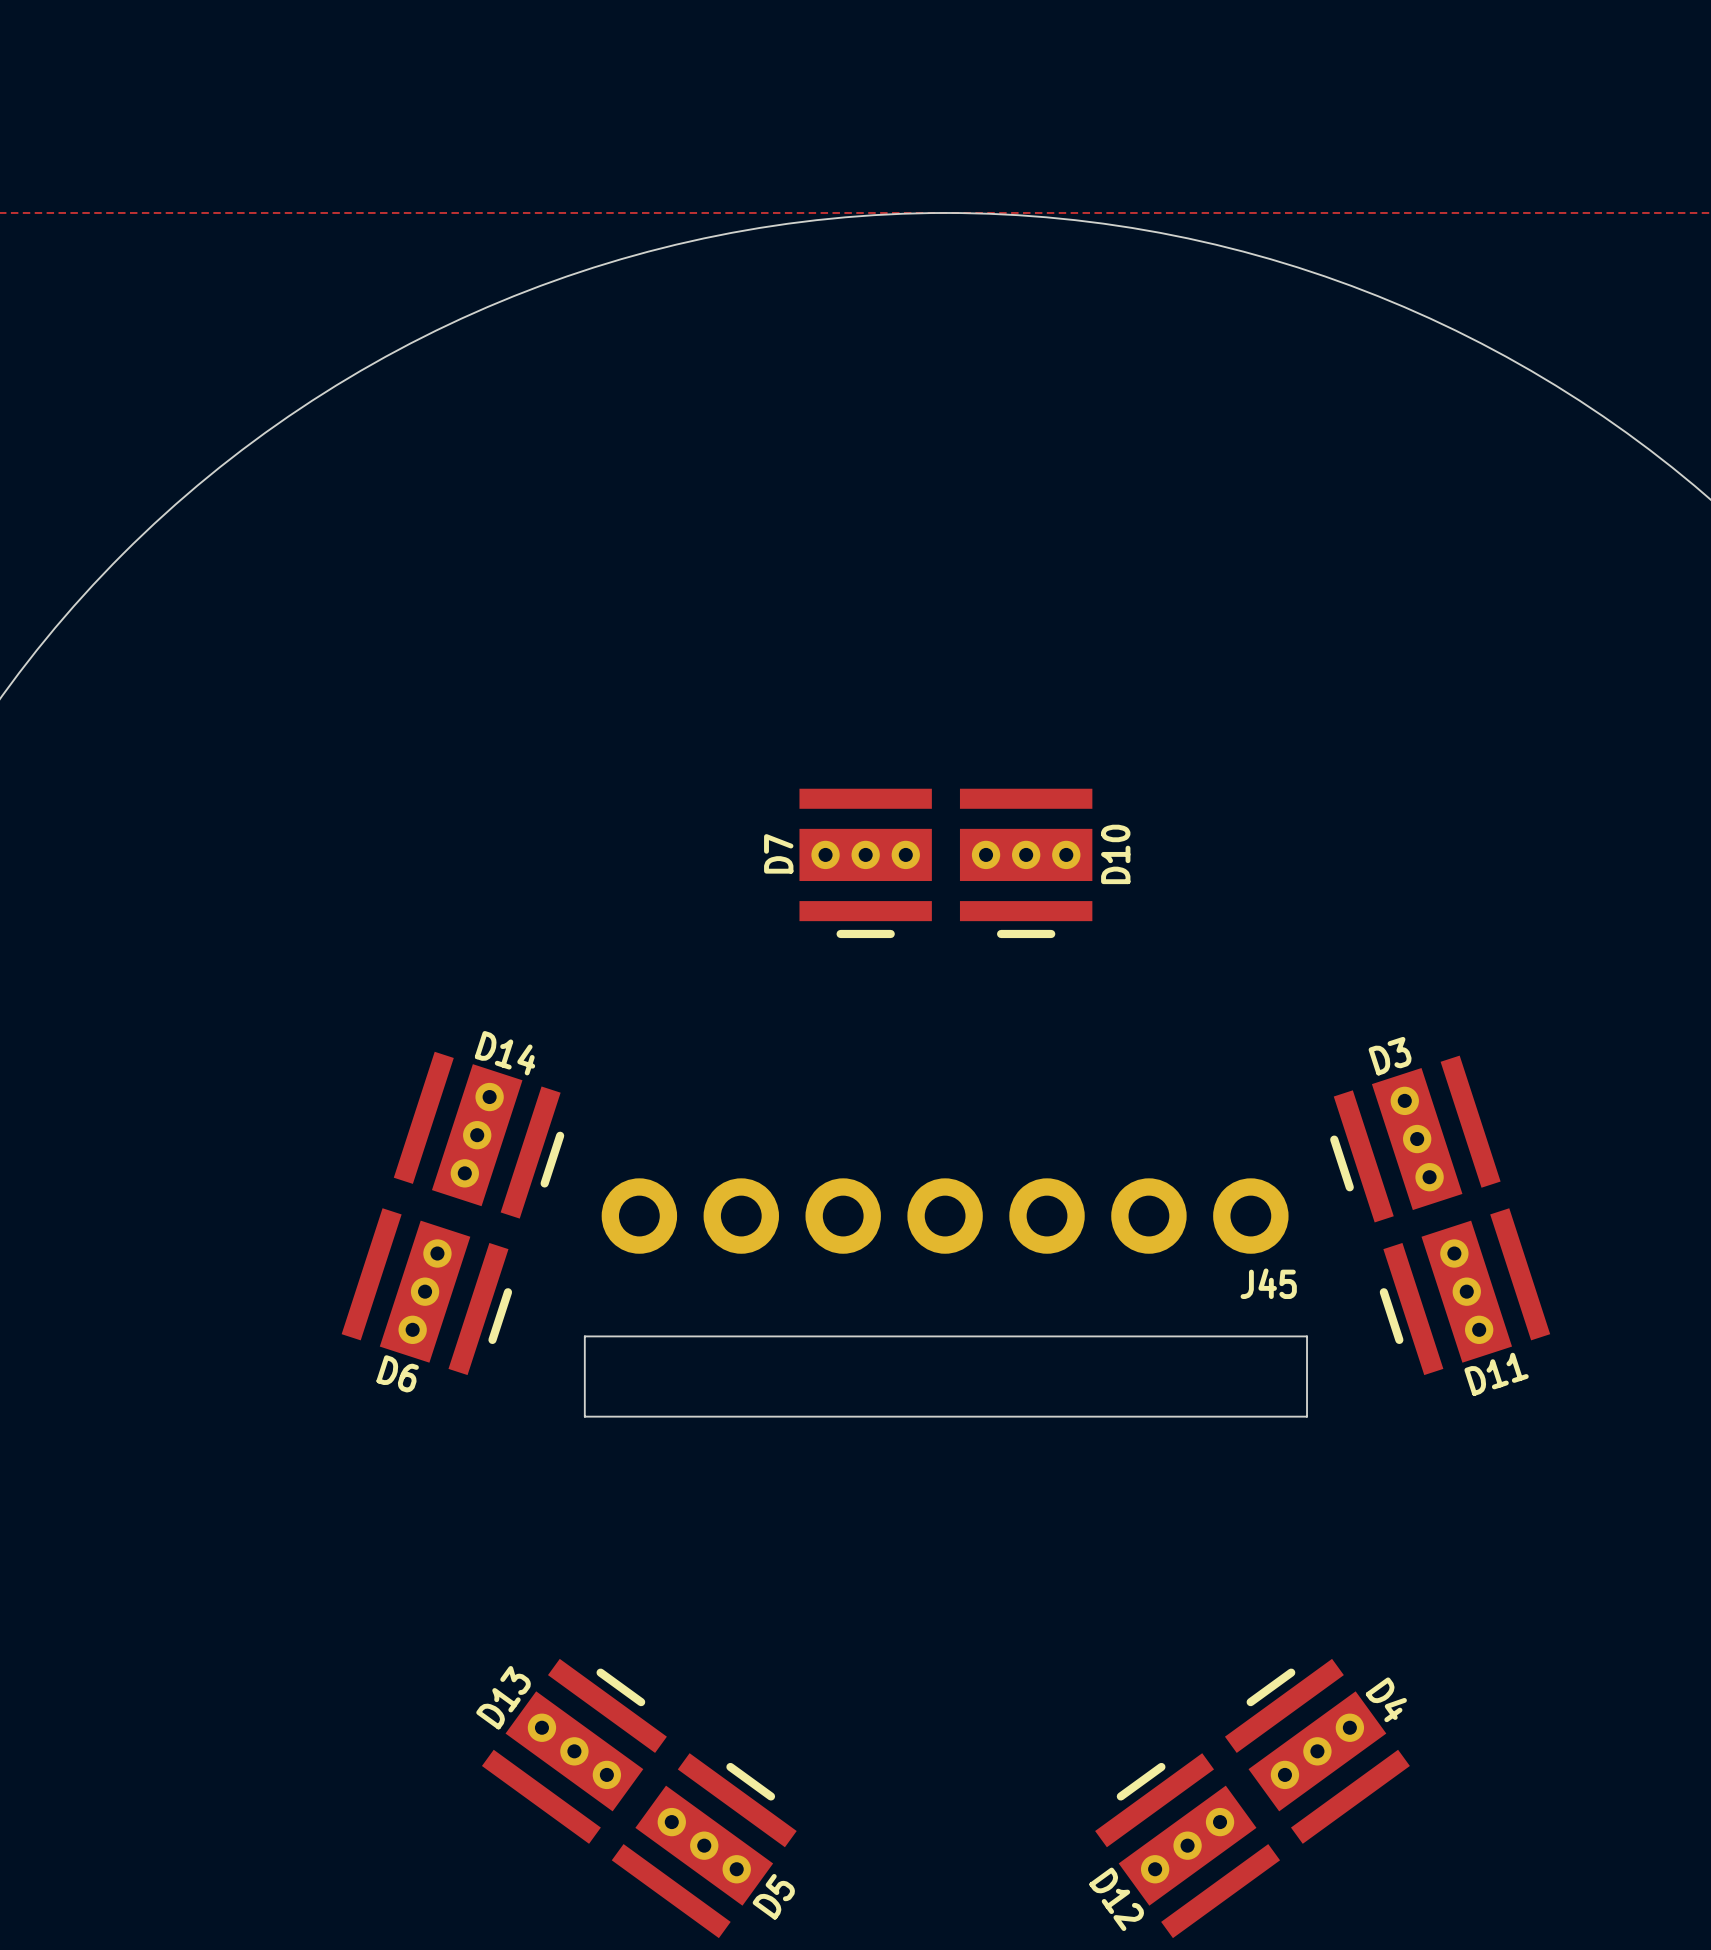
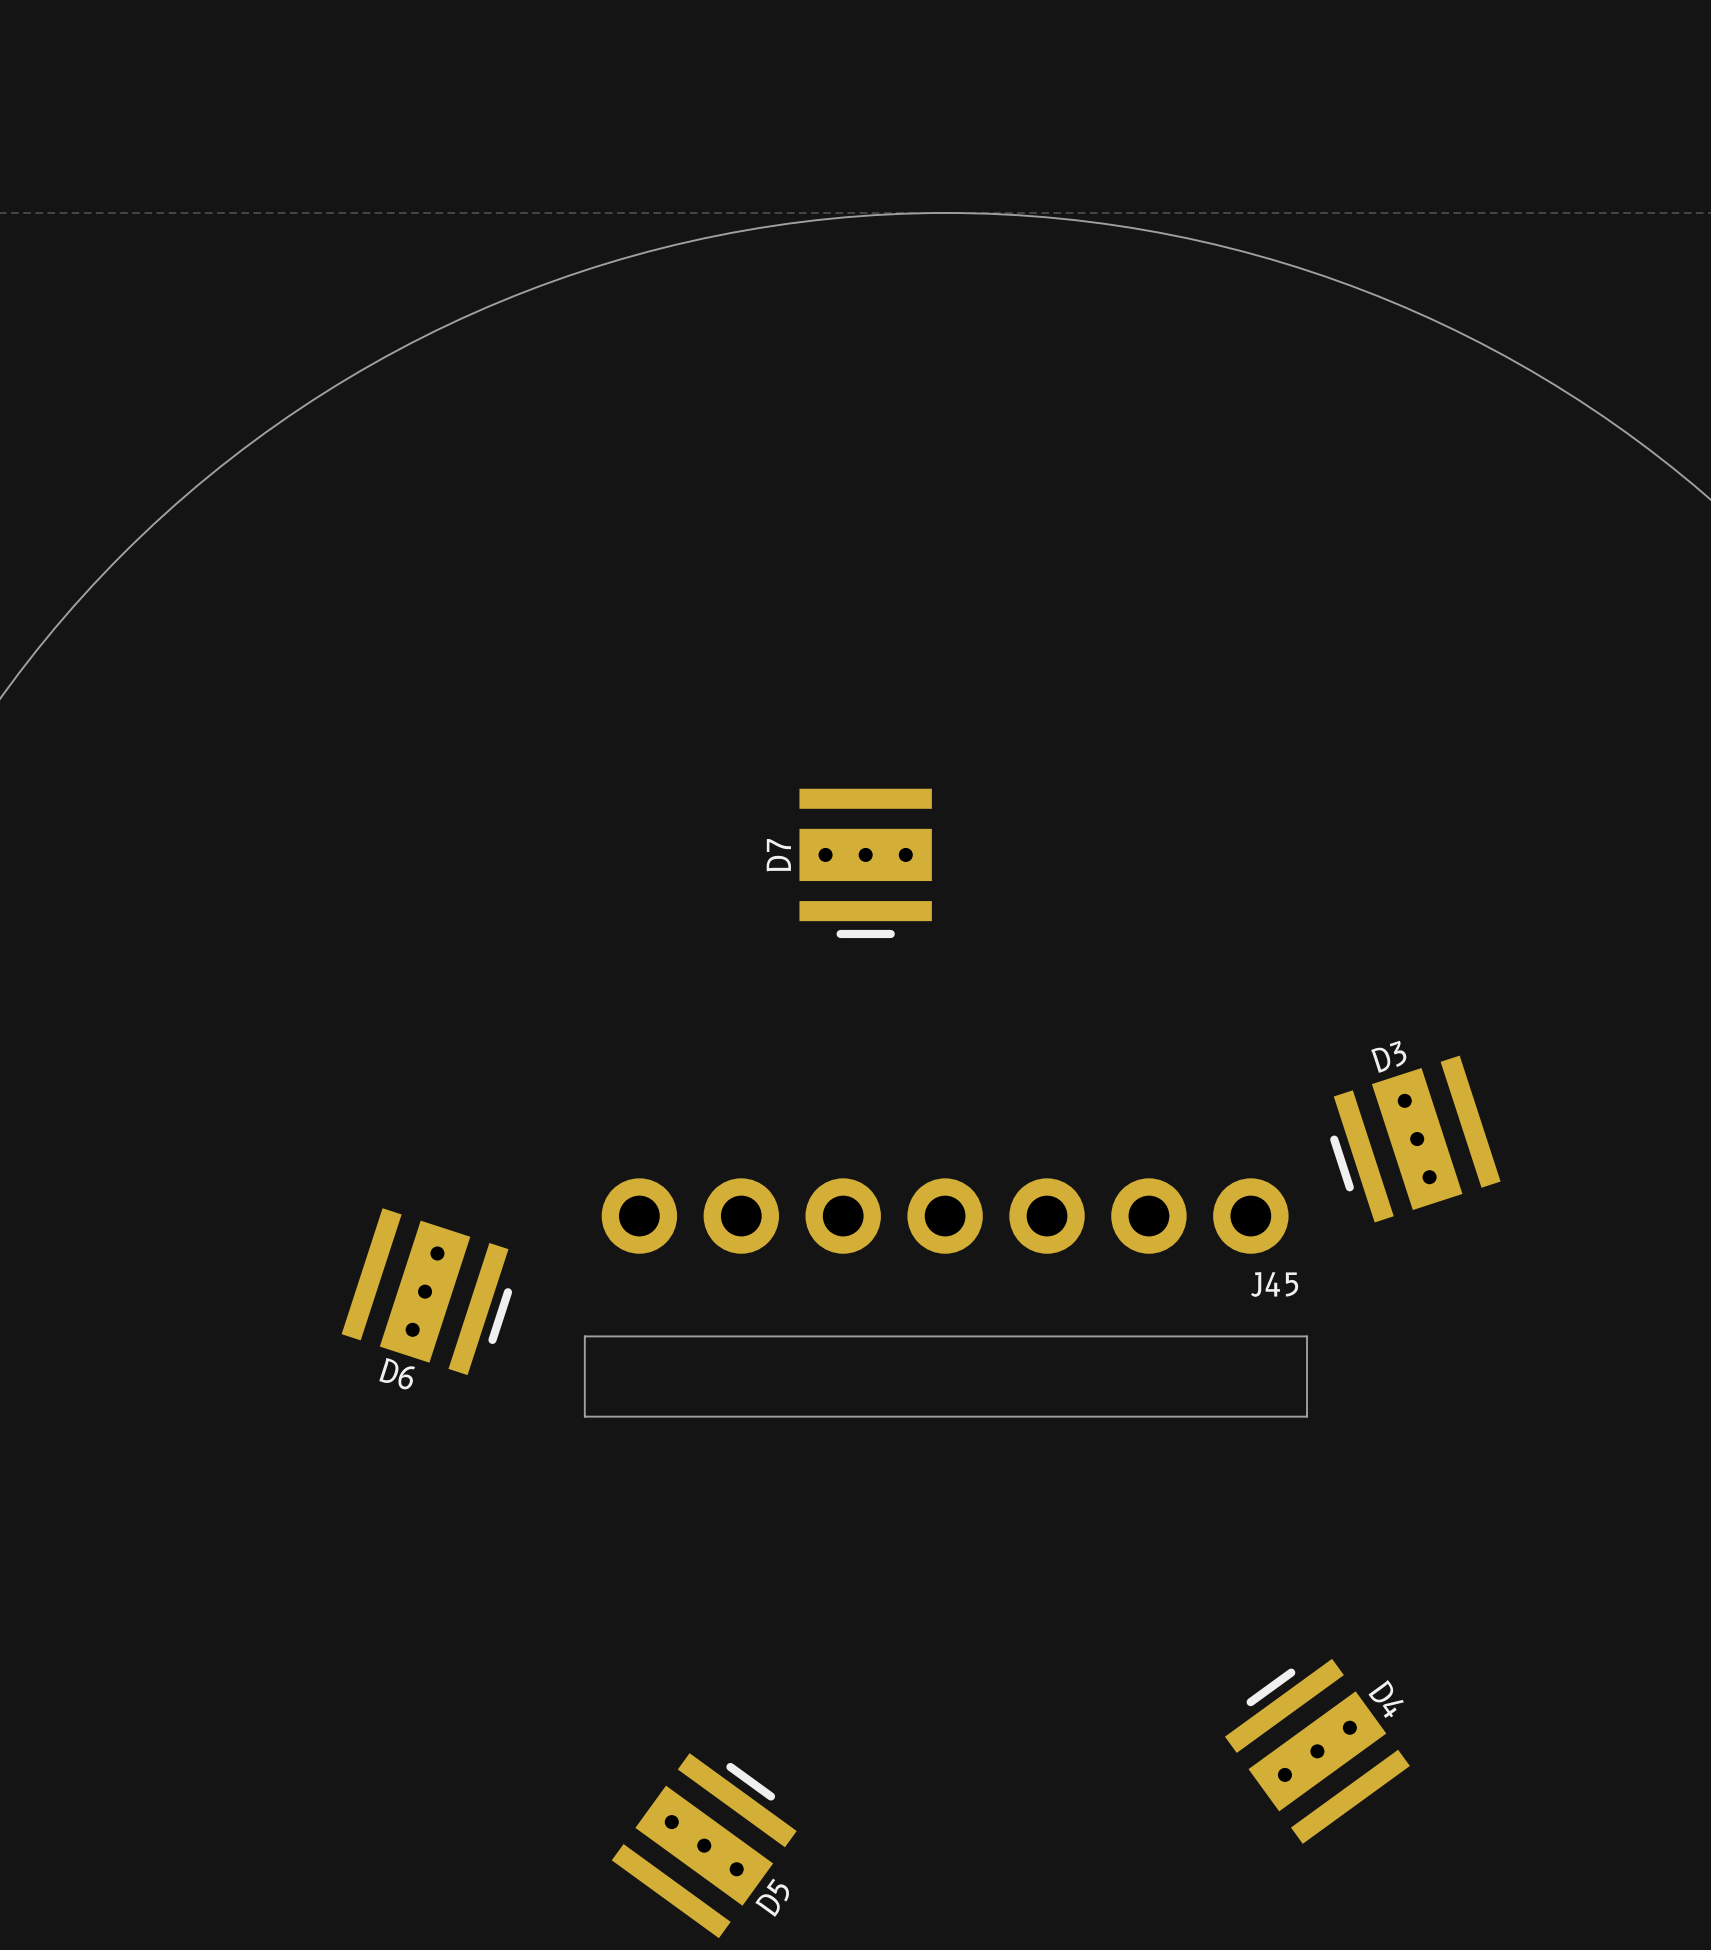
D10: (1026, 863) -> none
D14: (479, 1135) -> none
D11: (1464, 1291) -> none
D13: (574, 1751) -> none
D12: (1187, 1845) -> none

